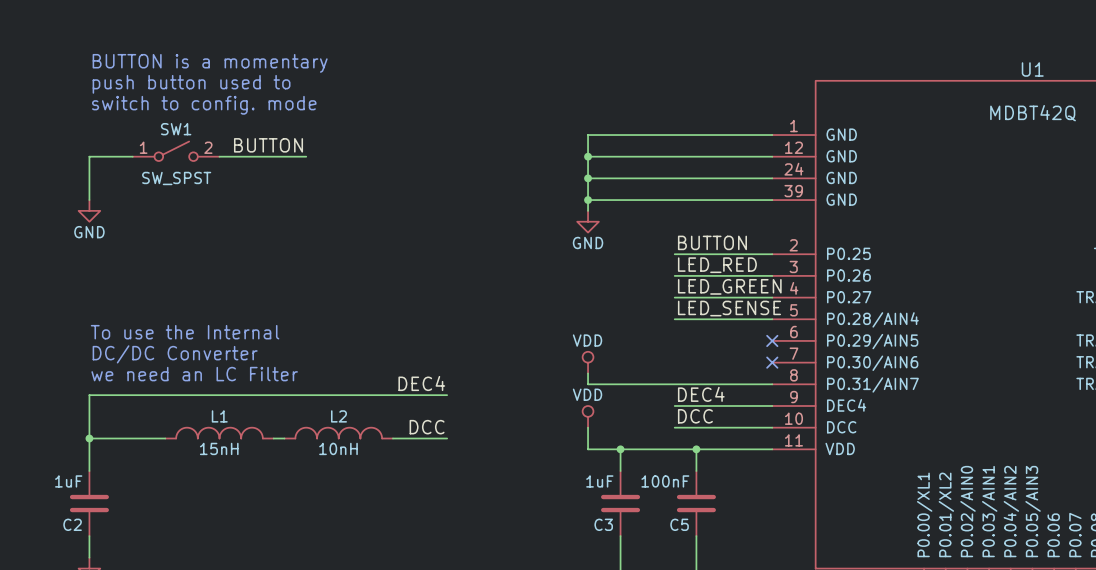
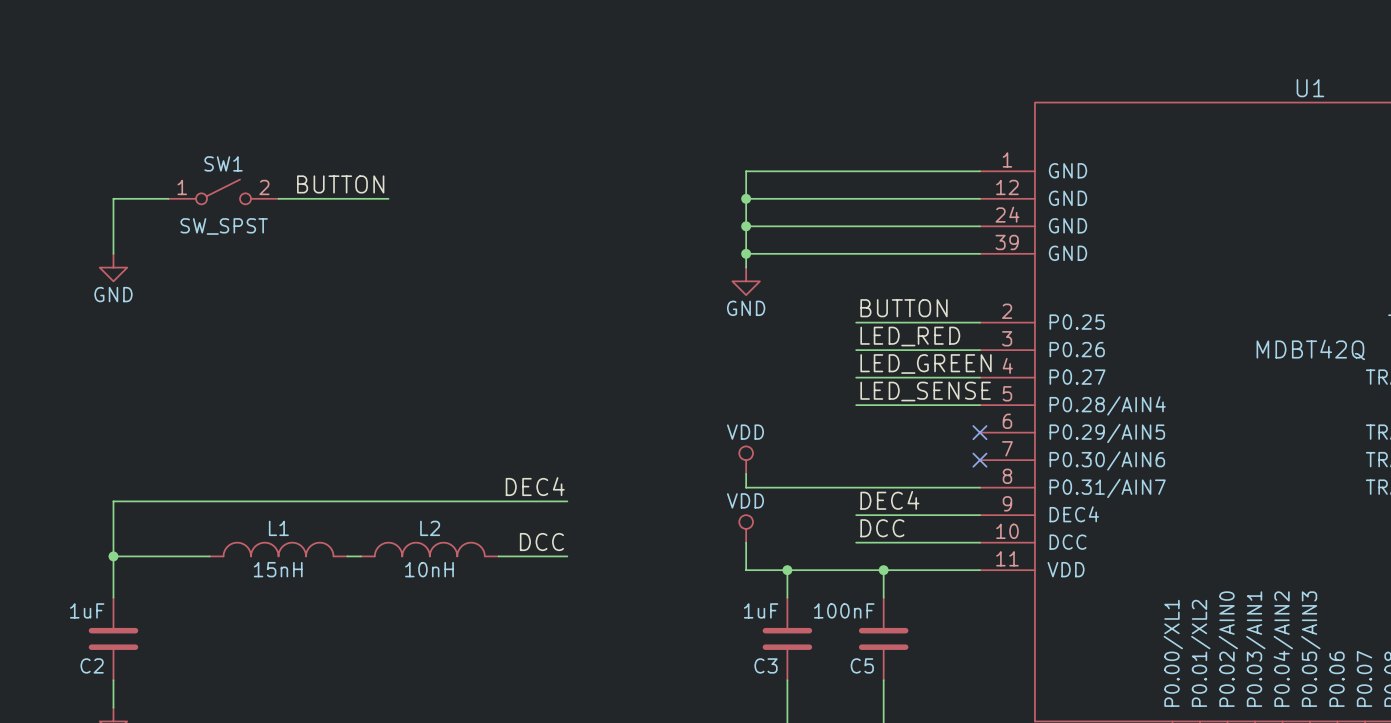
text: BUTTON is a momentary (210, 63) -> none
text: push button used to (191, 84) -> none
text: switch to config. mode (204, 105) -> none
U1 value position: MDBT42Q (1033, 113) -> MDBT42Q (1310, 349)
text: To use the Internal (185, 332) -> none
text: DC/DC Converter (175, 354) -> none
text: we need an LC Filter (194, 374) -> none

